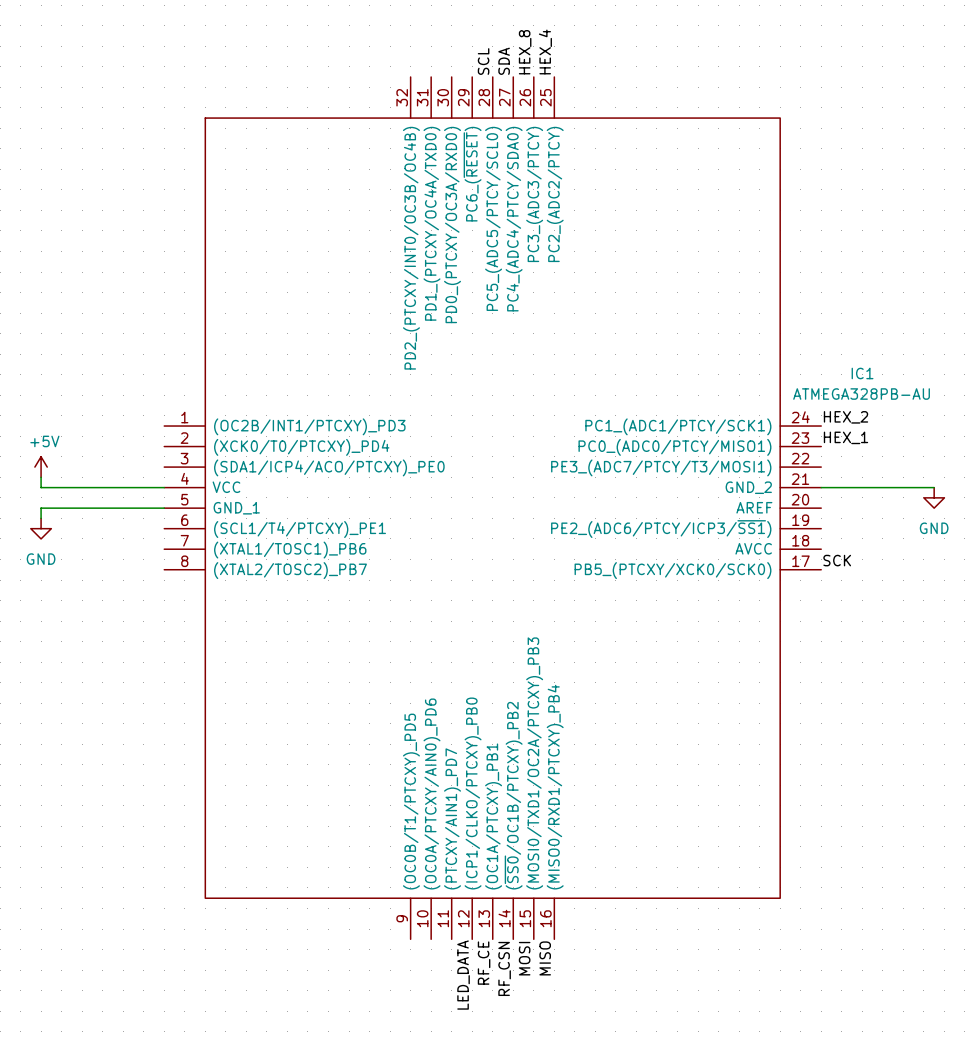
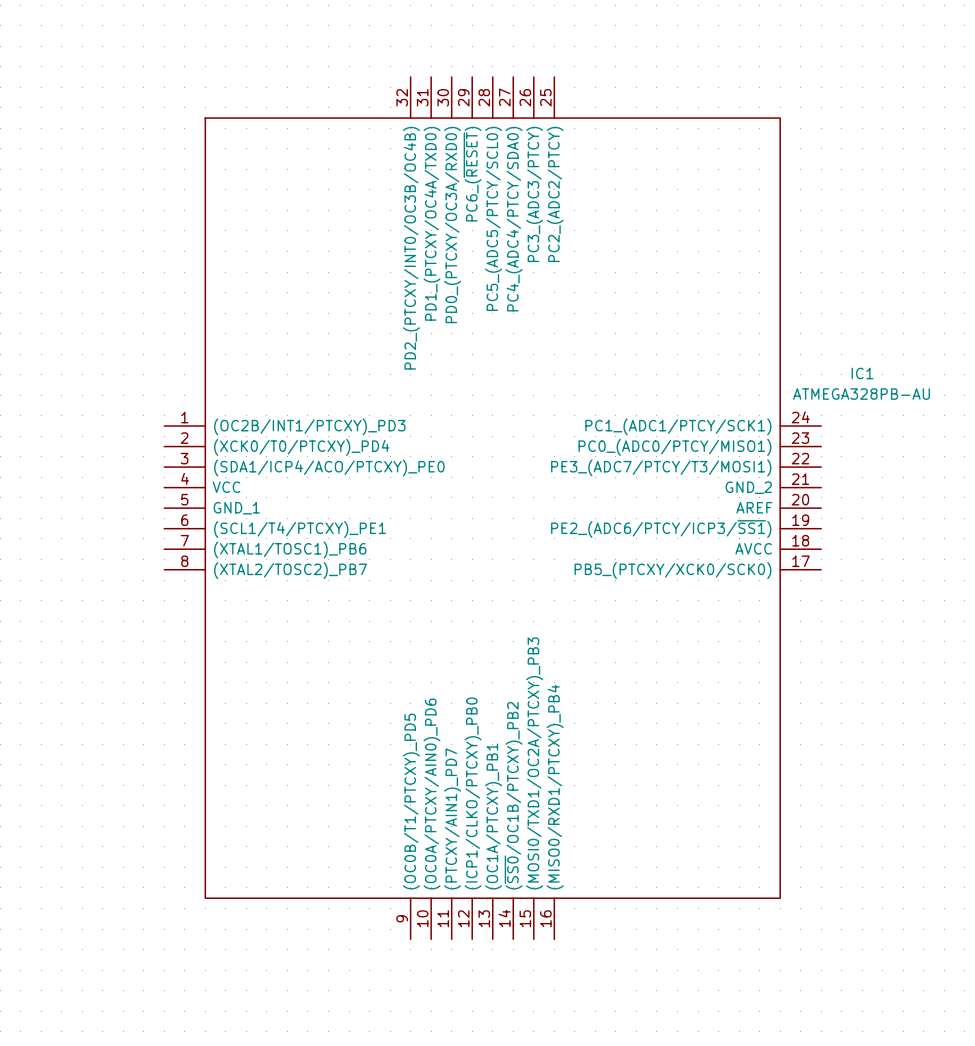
label: HEX_4 (545, 51) -> none
label: HEX_8 (525, 52) -> none
label: SCL (483, 61) -> none
label: SDA (504, 61) -> none
label: HEX_2 (845, 417) -> none
label: HEX_1 (845, 437) -> none
power symbol: +5V (41, 467) -> none
wire: (41, 477) (41, 487) (164, 487) -> none
wire: (821, 487) (934, 487) -> none
power symbol: GND (934, 497) -> none
wire: (164, 508) (41, 508) (41, 518) -> none
power symbol: GND (41, 528) -> none
label: SCK (837, 560) -> none
label: MOSI (524, 958) -> none
label: MISO (545, 958) -> none
label: RF_CE (484, 963) -> none
label: RF_CSN (504, 968) -> none
label: LED_DATA (463, 975) -> none

